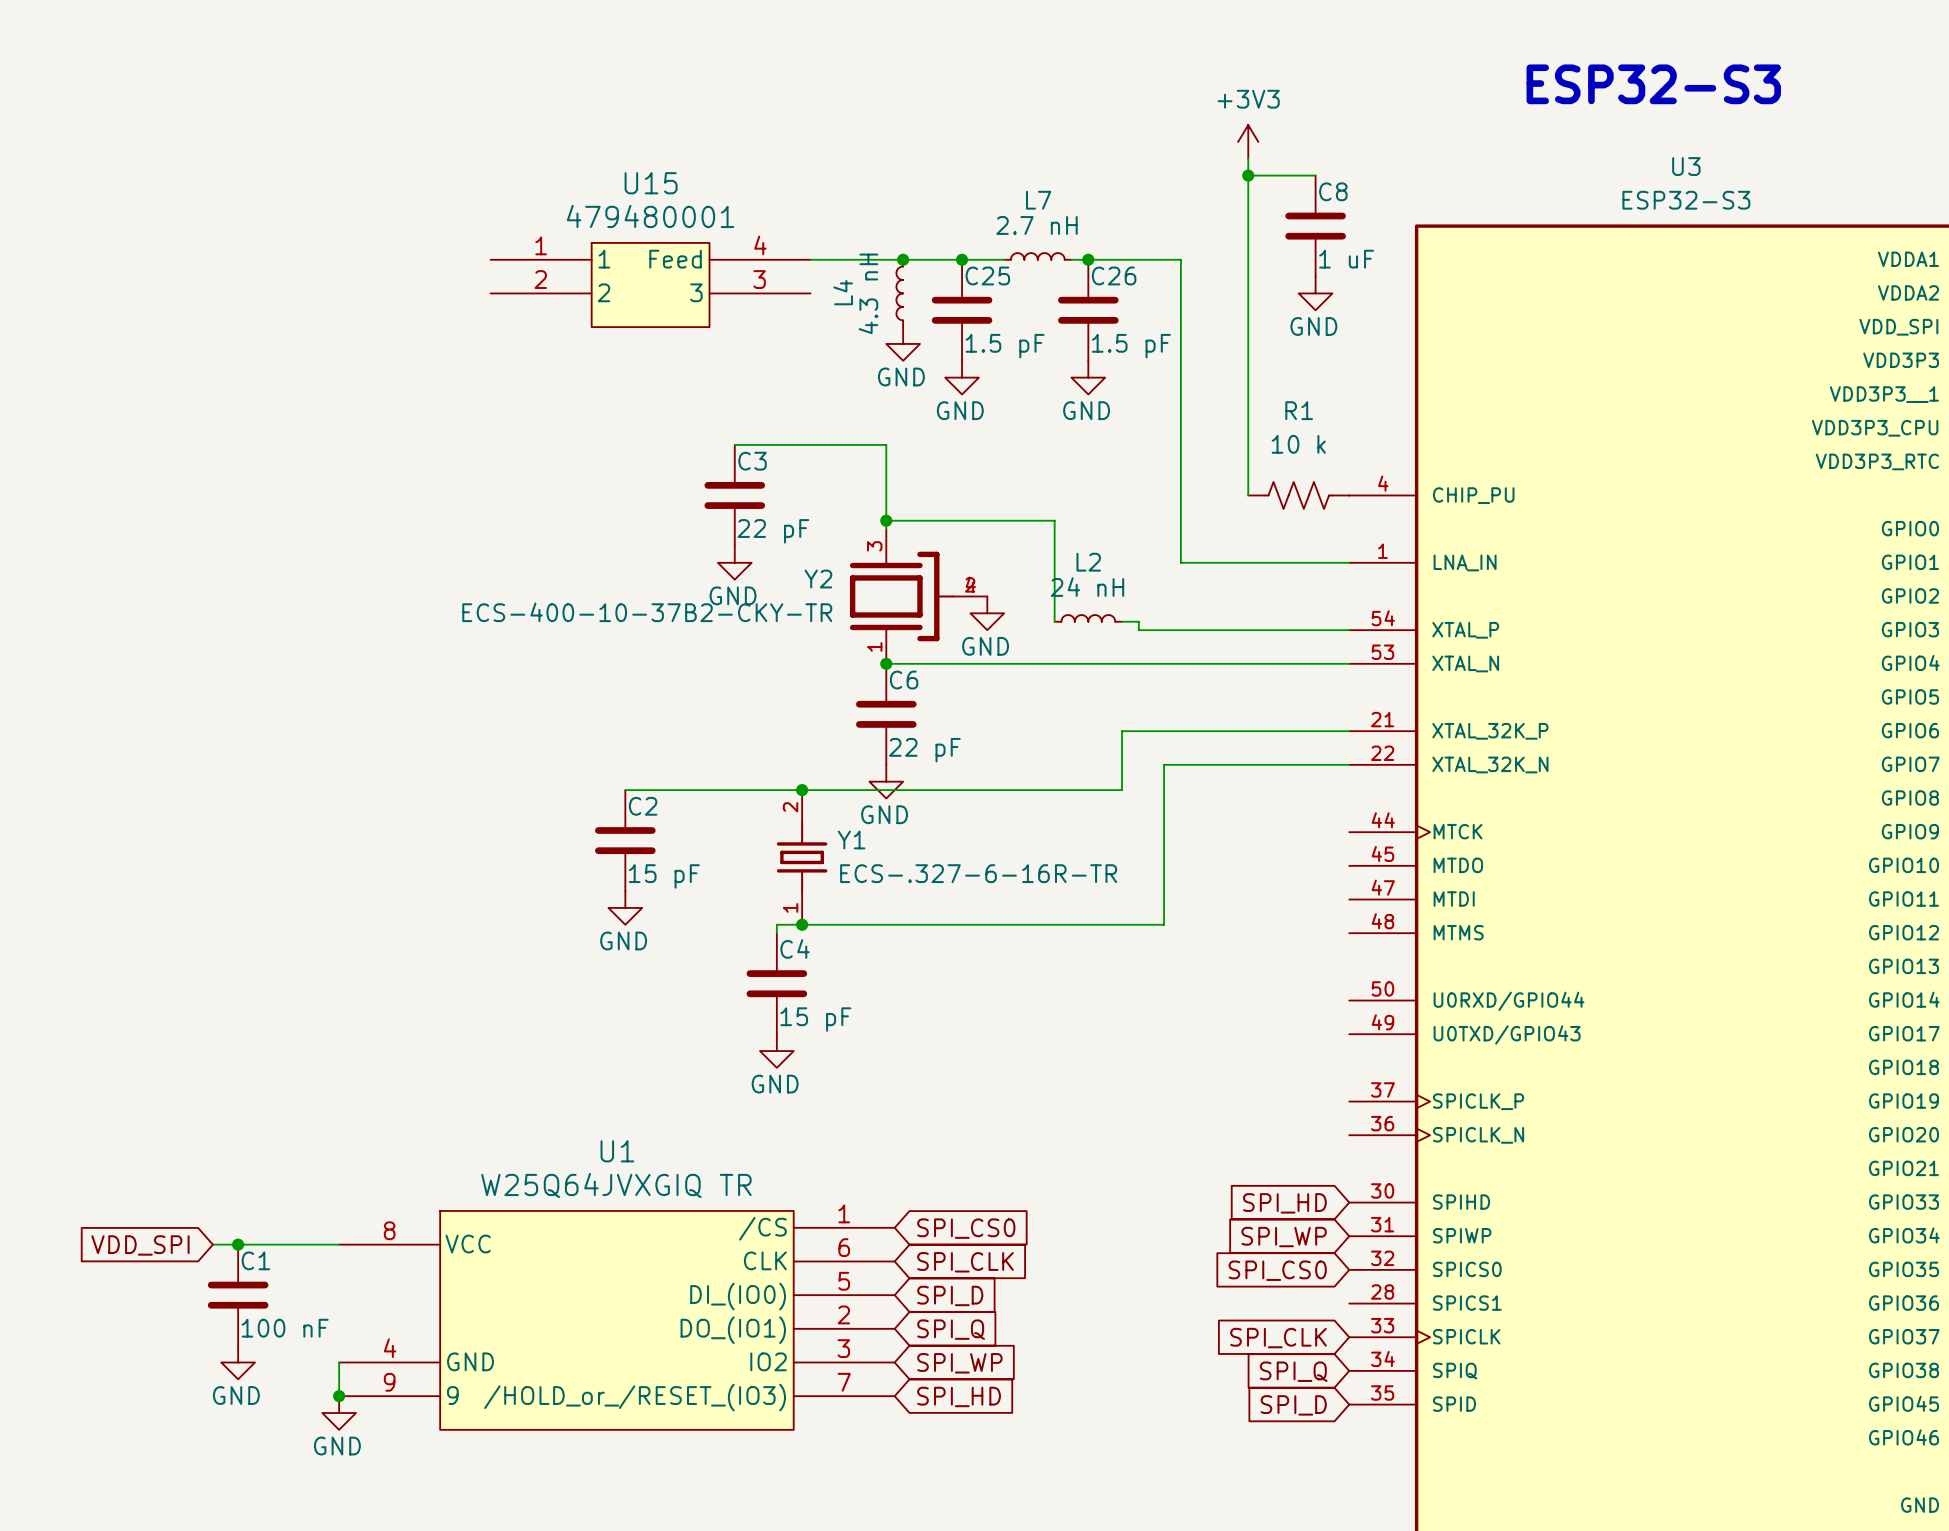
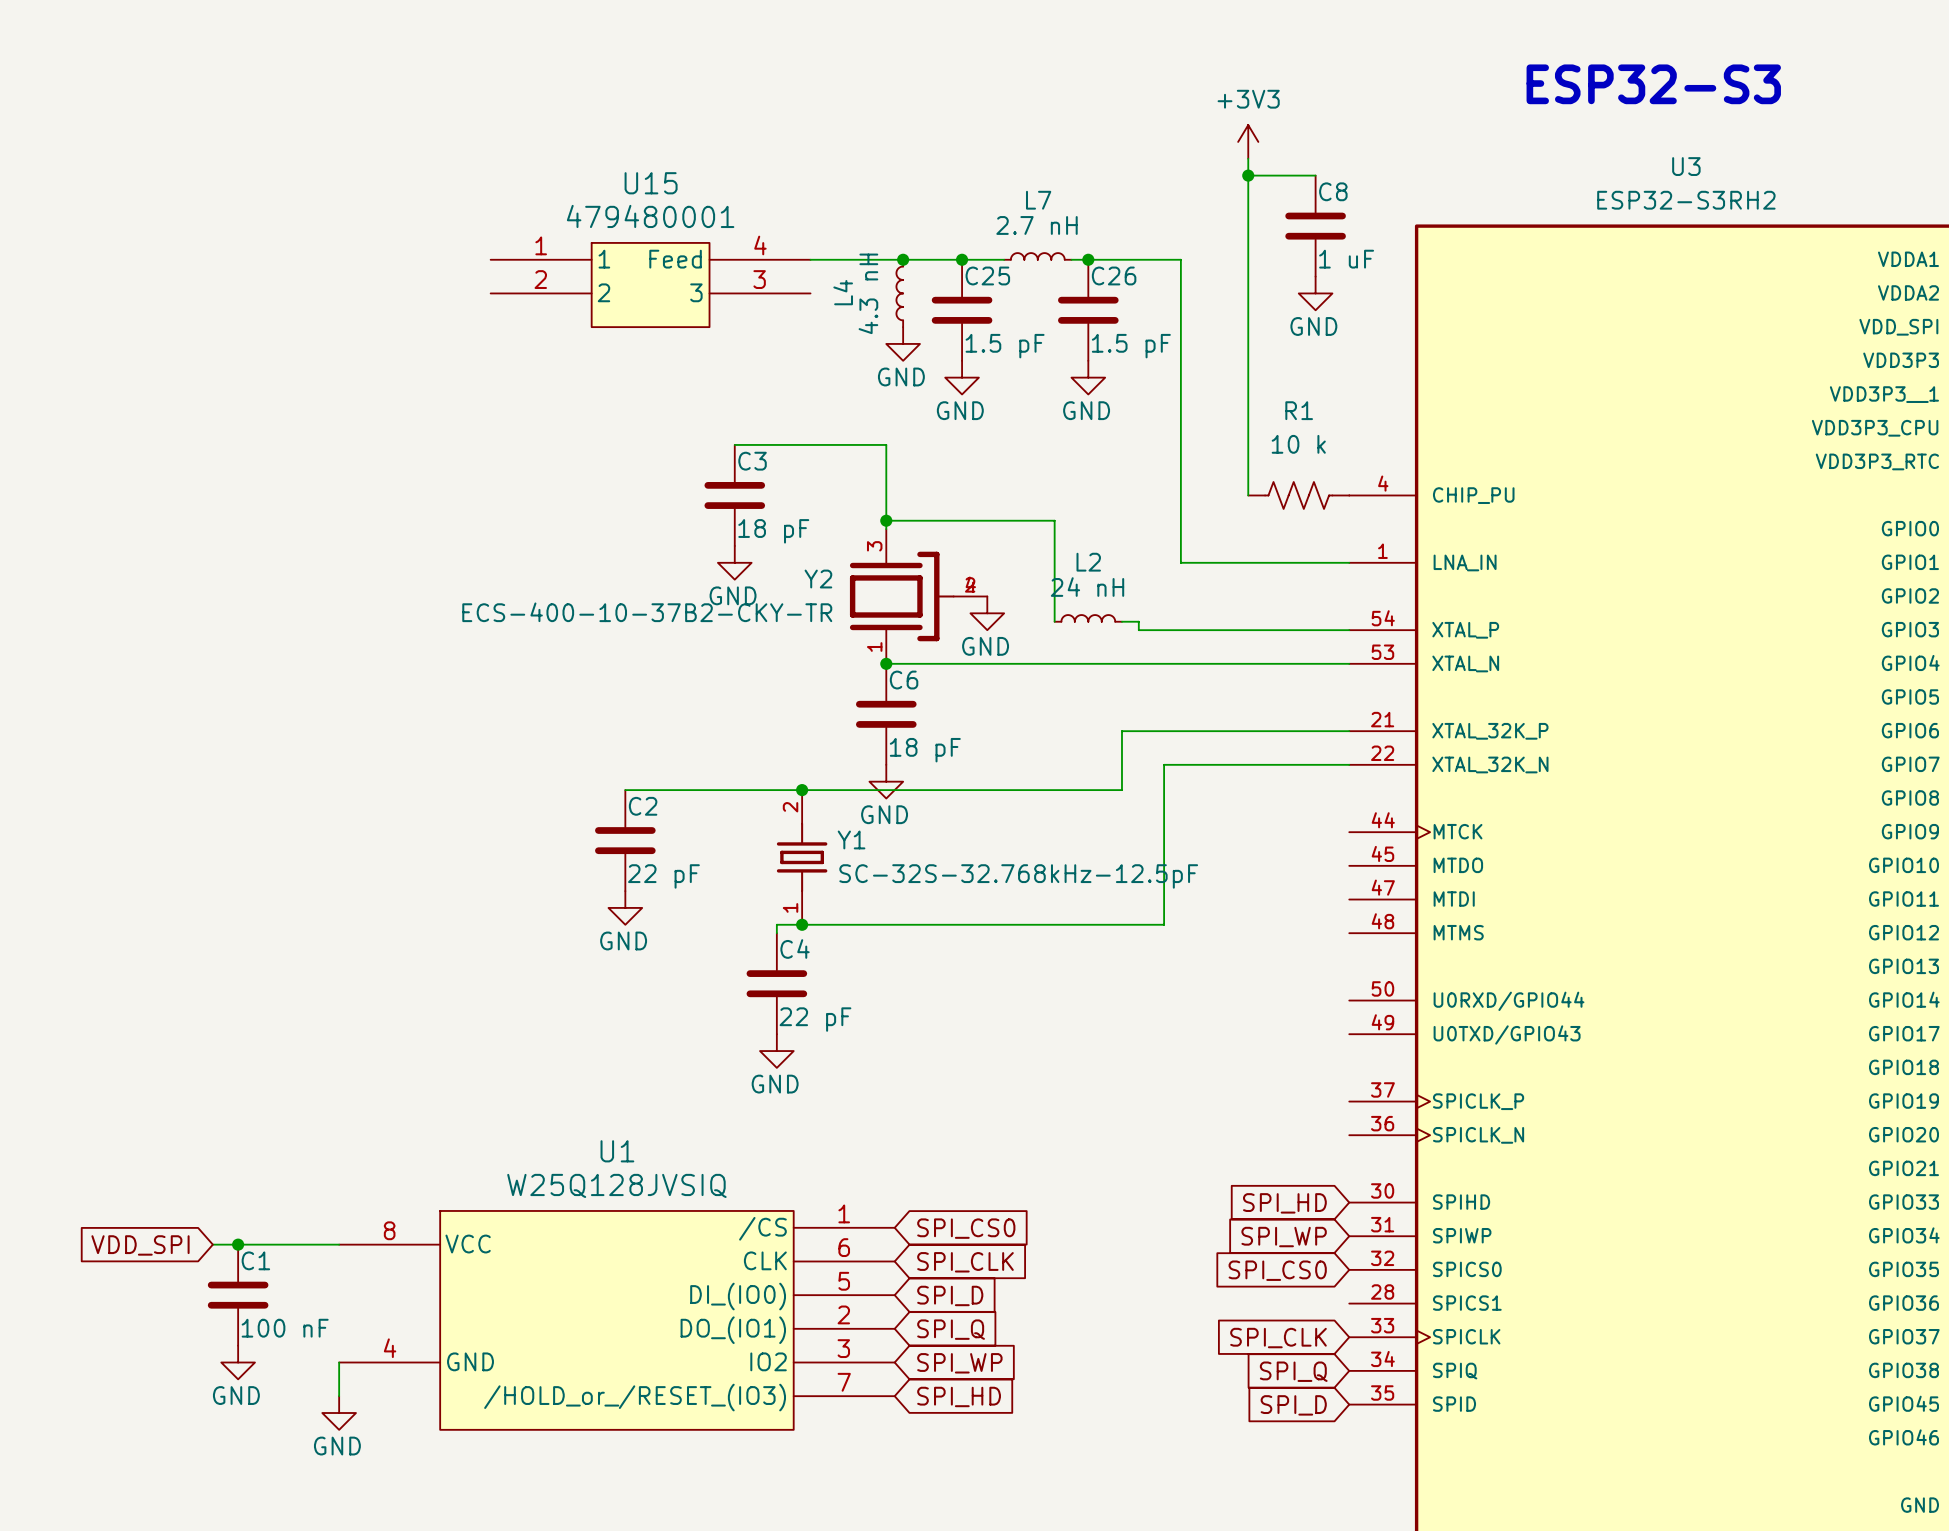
U3 value: ESP32-S3 (1686, 200) -> ESP32-S3RH2 (1686, 200)
C3 value: 22 pF (773, 531) -> 18 pF (773, 531)
C6 value: 22 pF (924, 750) -> 18 pF (925, 750)
Y1 value: ECS-.327-6-16R-TR (978, 873) -> SC-32S-32.768kHz-12.5pF (1018, 876)
C2 value: 15 pF (664, 876) -> 22 pF (663, 876)
C4 value: 15 pF (815, 1019) -> 22 pF (815, 1019)
U1 value: W25Q64JVXGIQ TR (616, 1185) -> W25Q128JVSIQ (616, 1185)
U1 symbol: [339, 1210, 895, 1430] -> [339, 1210, 895, 1430]
junction: (339, 1396) -> none

